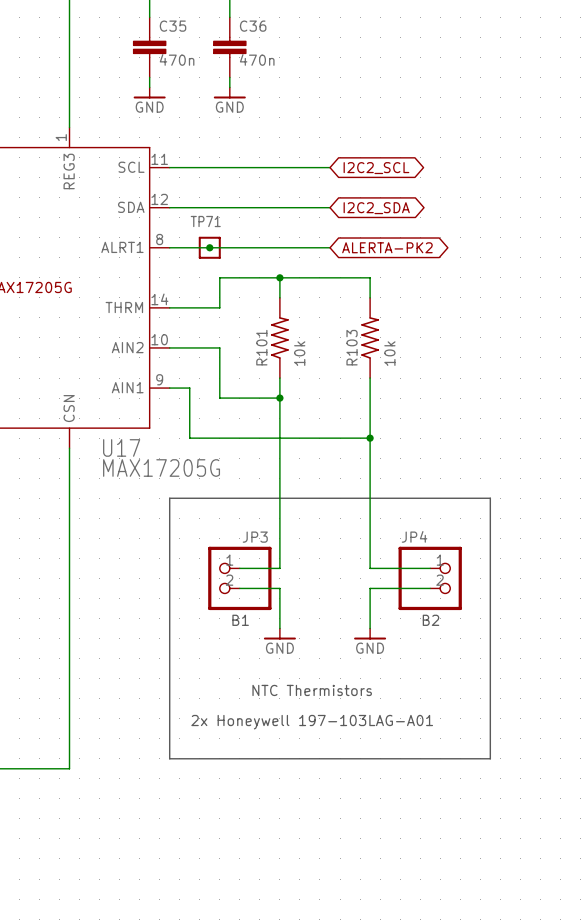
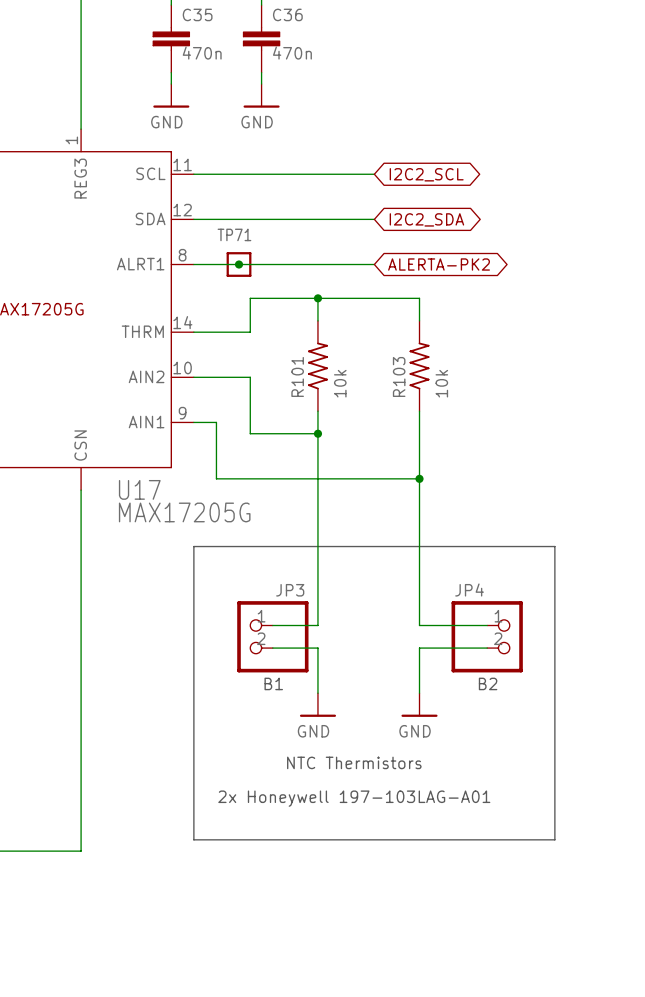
power symbol shape: [133, 87, 166, 99] -> [153, 84, 190, 108]
power symbol shape: [213, 87, 246, 99] -> [243, 84, 280, 108]
power symbol shape: [263, 628, 296, 640] -> [299, 693, 337, 717]
power symbol shape: [354, 628, 387, 640] -> [401, 693, 438, 717]

